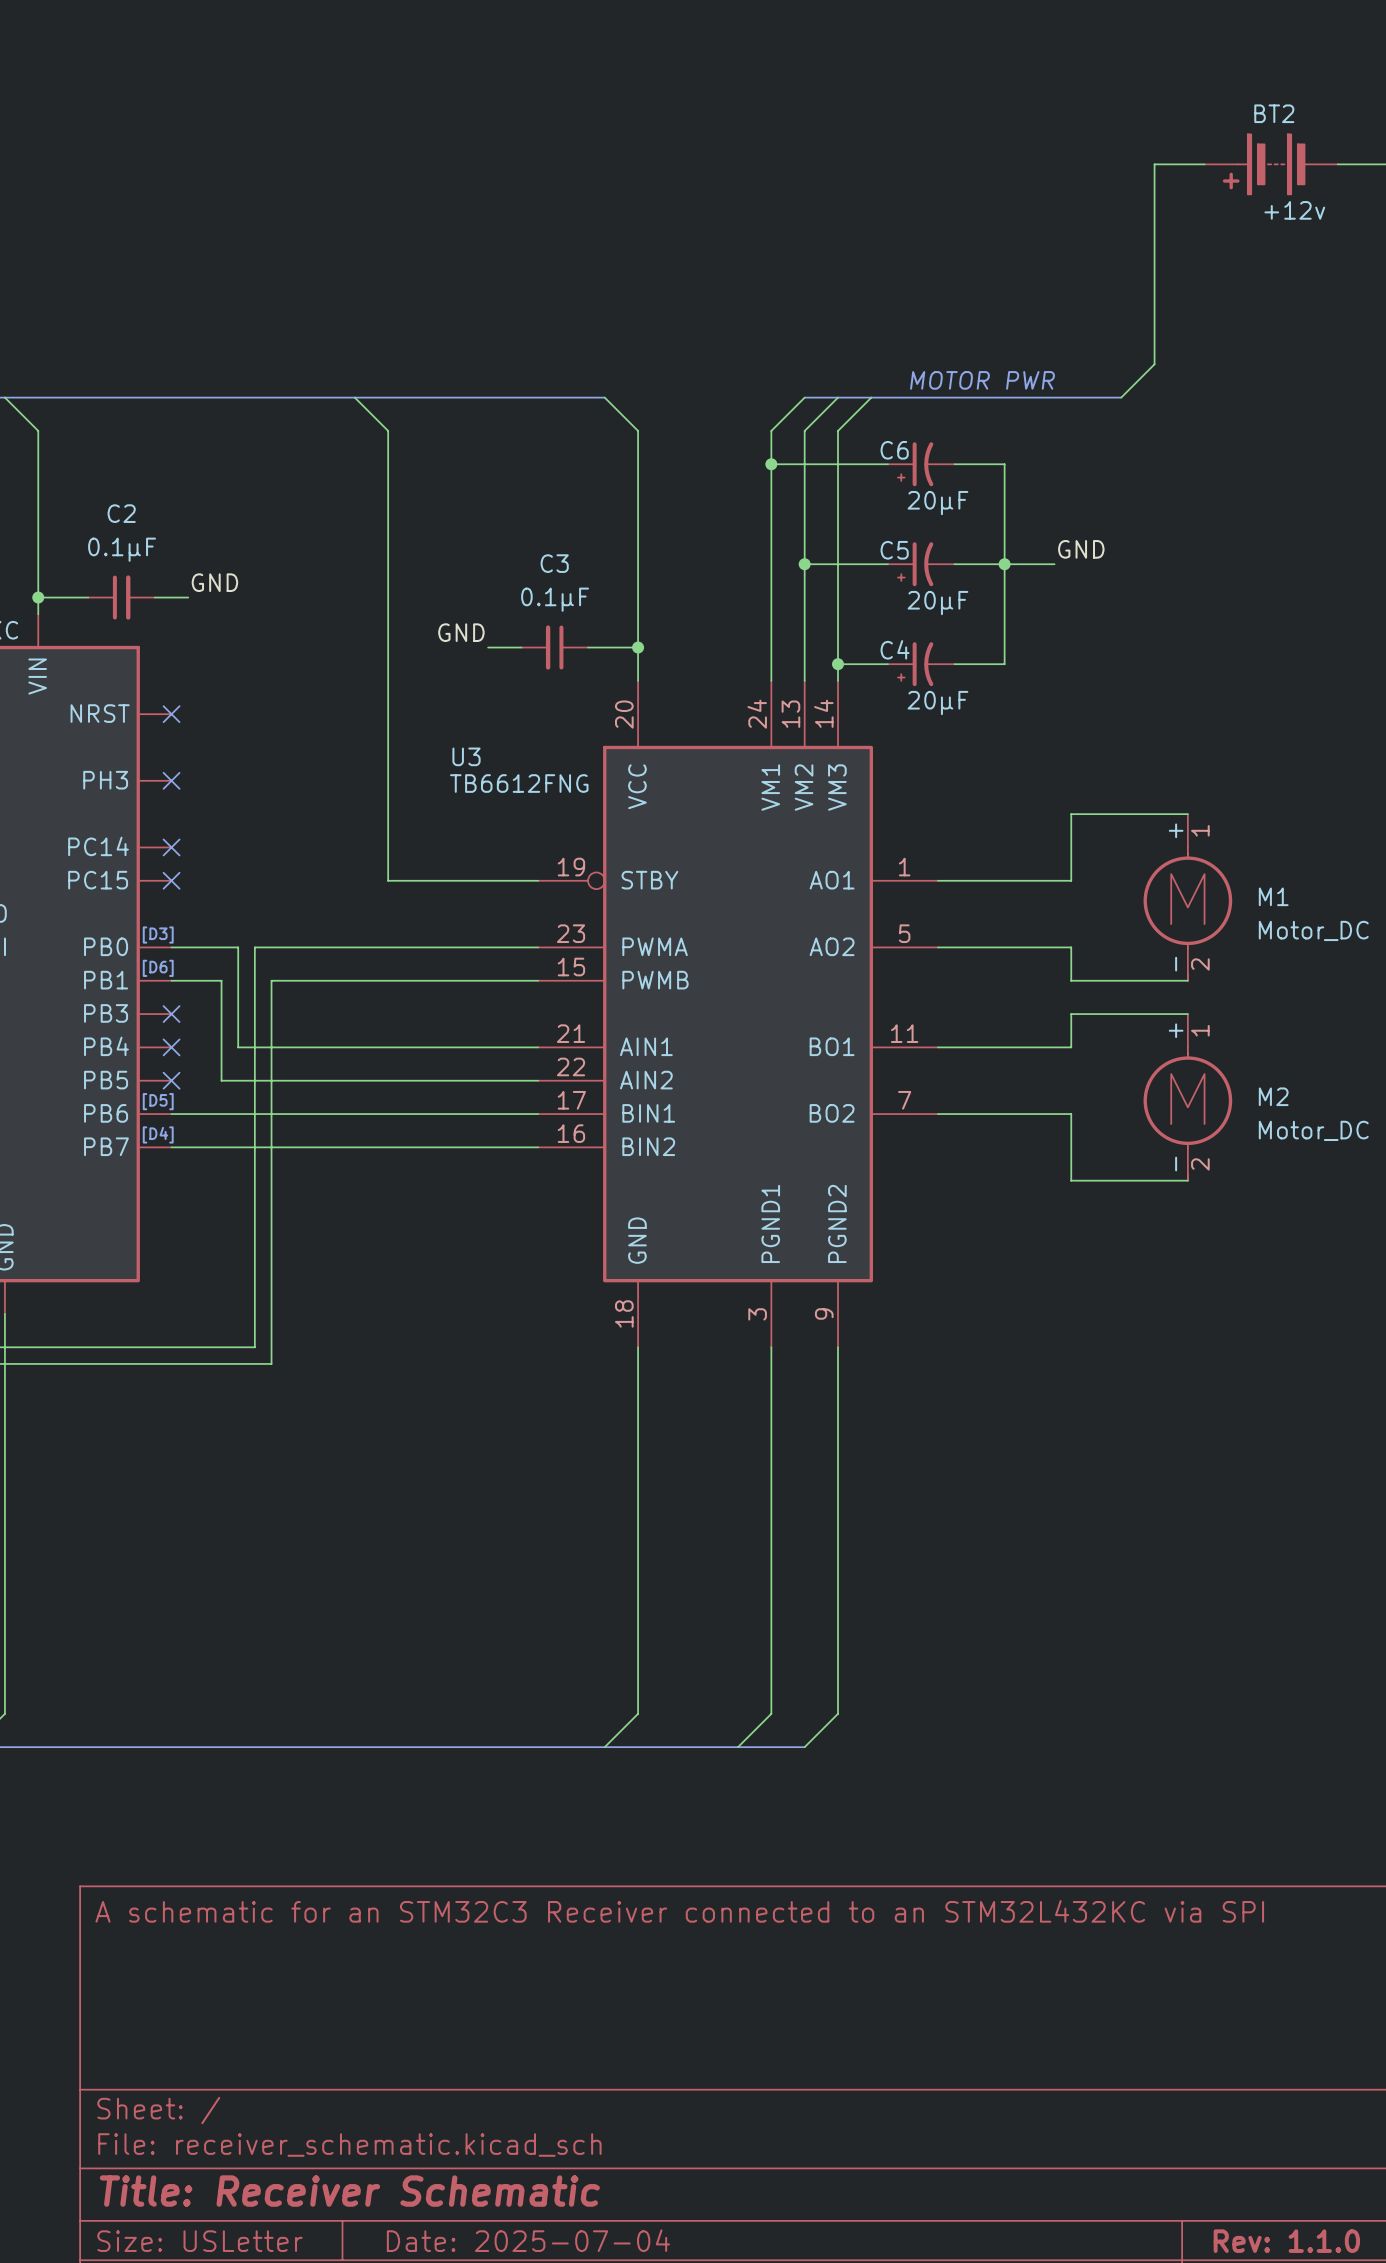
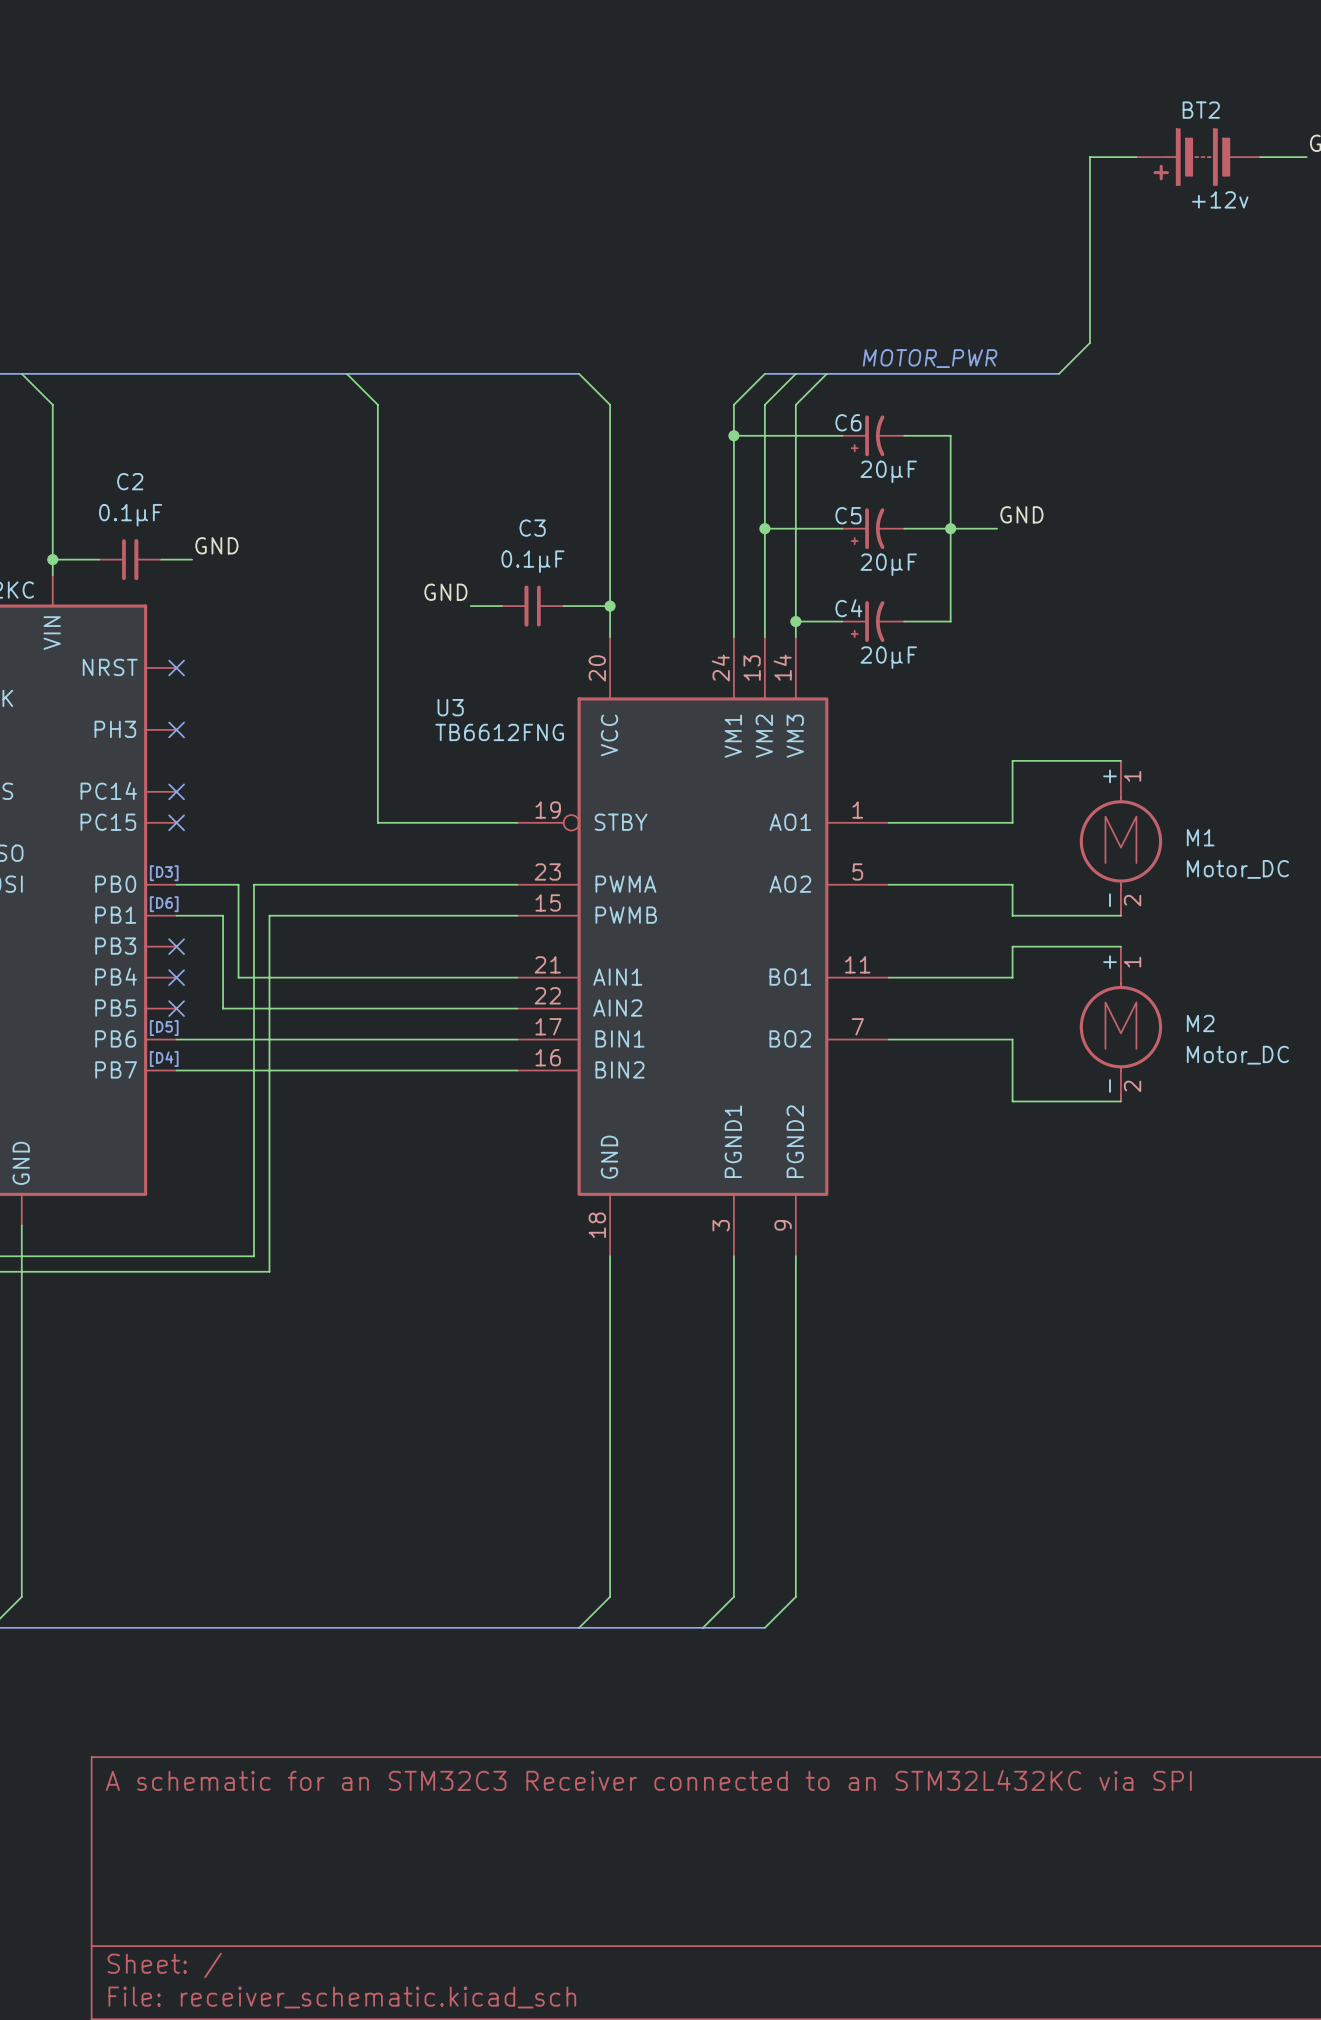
text: MOTOR PWR (982, 380) -> MOTOR_PWR (930, 358)

